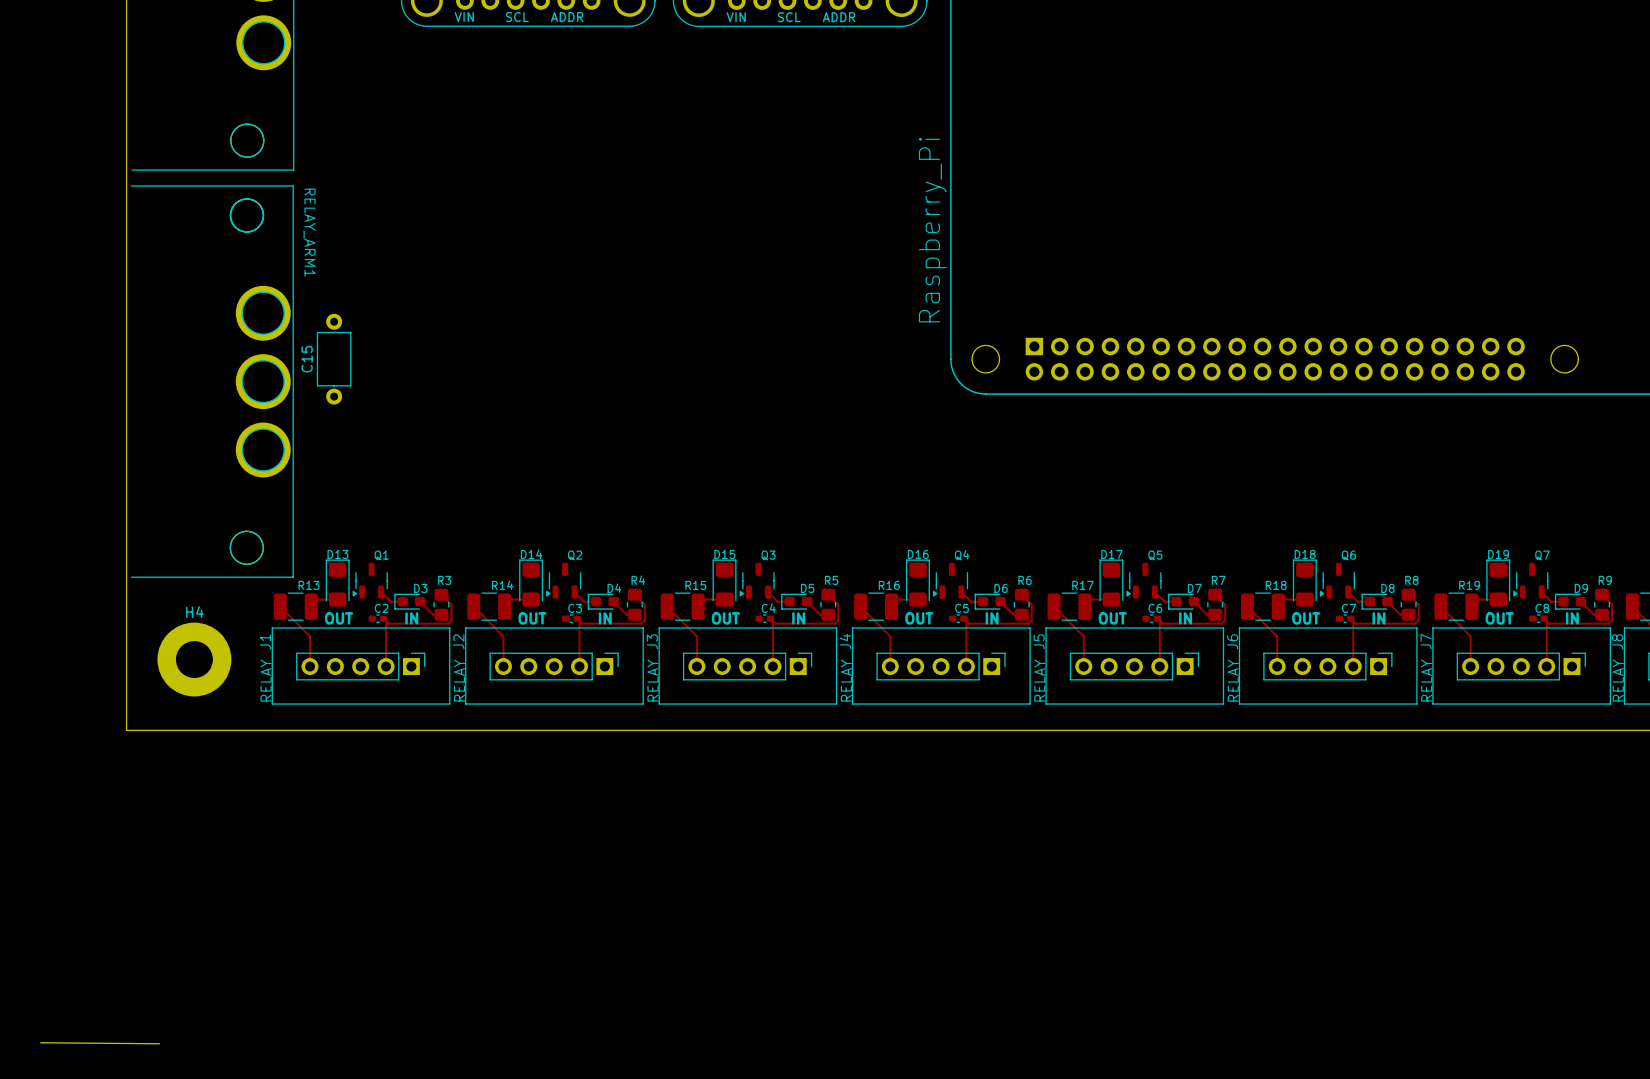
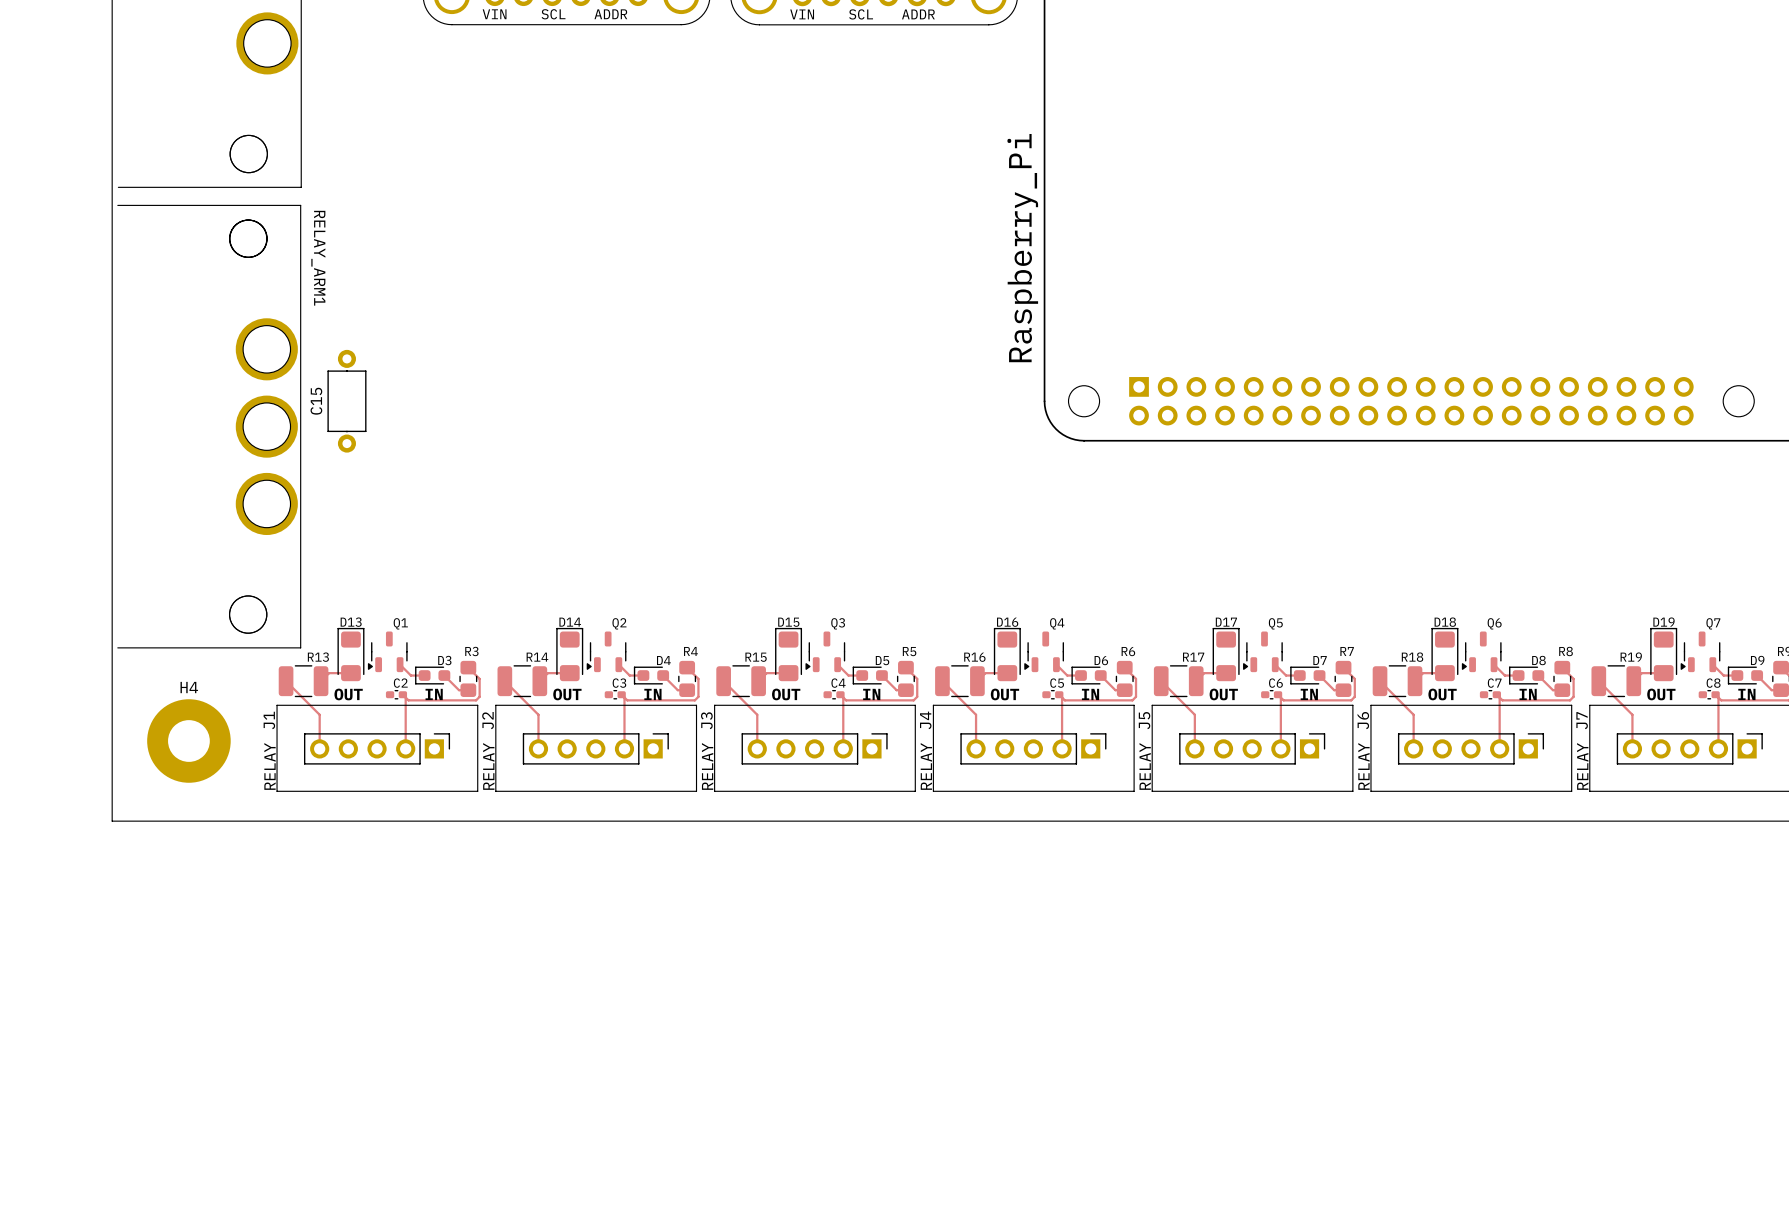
board edge: (40, 1042) (159, 1043) -> none

